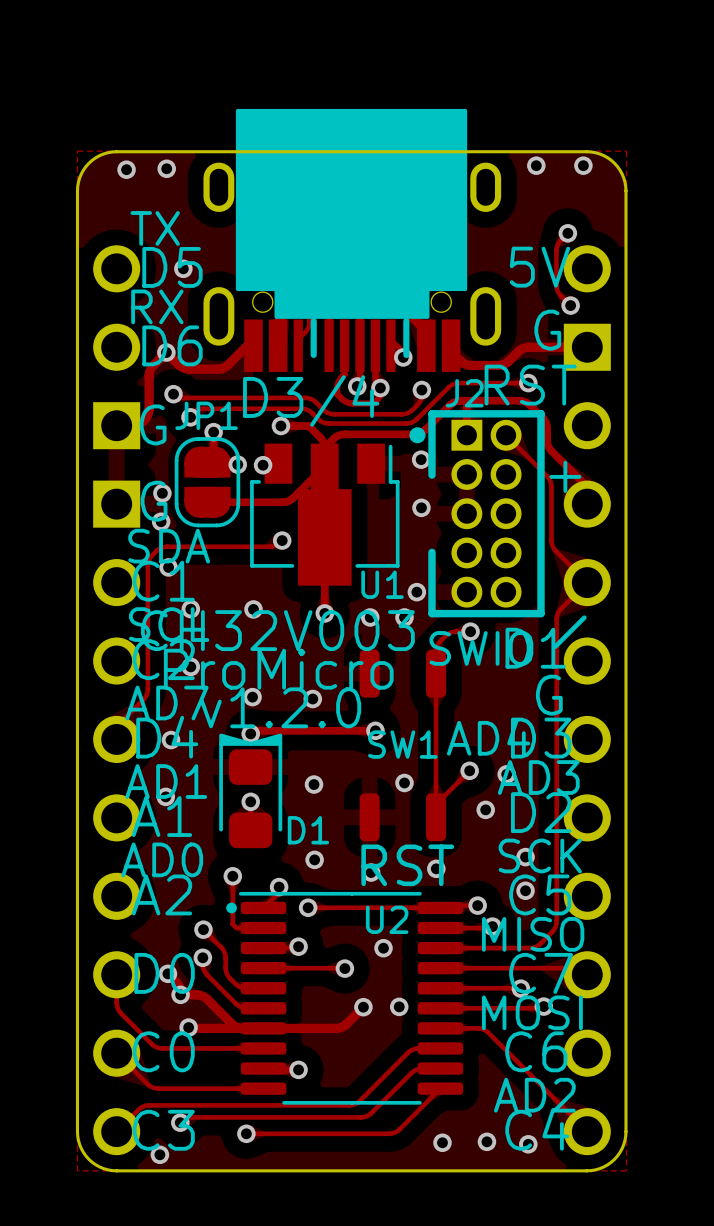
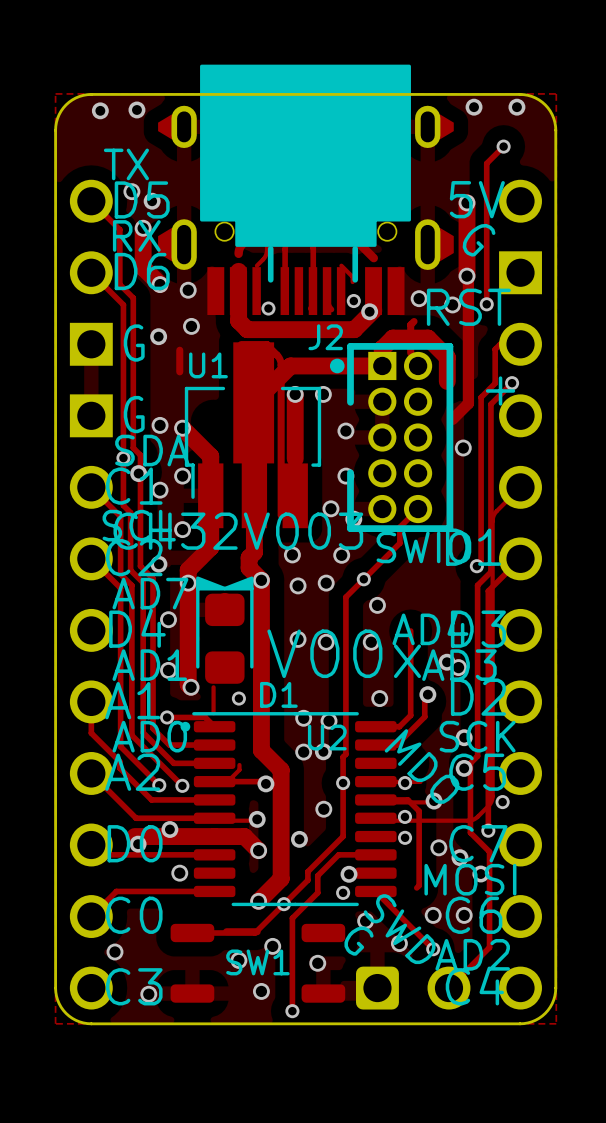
part footprint: [203, 108, 502, 372] -> [158, 64, 454, 316]
track: none -> (503, 146) (486, 163) (486, 304)
via: none -> (503, 146)
track: (567, 233) (559, 241) (556, 248) (556, 284) (559, 294) (570, 305) -> none
via: (567, 233) -> none
via: none -> (131, 191)
track: none -> (91, 201) (119, 229) (119, 284) (133, 298) (133, 448) (140, 455) (140, 566) (153, 578) (153, 728) (169, 745) (214, 745)
track: none -> (467, 202) (468, 403) (452, 419)
via: none -> (467, 202)
track: none -> (143, 228) (143, 267) (160, 284)
via: none -> (143, 228)
via: (570, 305) -> none
text position: RX (157, 306) -> RX (136, 235)
text rotation: 0° (547, 330) -> 45° clockwise (479, 240)
track: (253, 339) (227, 365) (220, 368) (185, 368) (166, 352) (149, 371) (147, 414) (140, 423) (132, 425) -> none
track: none -> (238, 271) (238, 320) (247, 329) (354, 329) (373, 310)
track: (344, 345) (344, 374) (338, 382) (337, 394) (349, 403) (374, 403) (379, 396) (380, 388) -> none
track: none -> (91, 272) (123, 304) (123, 505) (130, 512) (130, 570) (143, 582) (143, 732) (173, 763) (214, 763)
track: (587, 347) (525, 347) (506, 362) (498, 365) (467, 364) (451, 351) -> none
via: none -> (467, 276)
via: (166, 352) -> none
via: (403, 357) -> none
via: none -> (160, 284)
via: none -> (188, 290)
via: none -> (419, 298)
via: none -> (353, 301)
via: none -> (486, 304)
track: (528, 383) (454, 383) (448, 387) (415, 420) (408, 423) (327, 423) (320, 420) (309, 410) (301, 408) (201, 408) (193, 411) (190, 417) -> none
via position: (528, 383) -> (452, 304)
via: none -> (268, 308)
via: (357, 386) -> none
via: (380, 388) -> none
track: (421, 390) (418, 403) (410, 411) (401, 414) (332, 414) (324, 411) (313, 400) (306, 397) (177, 397) (173, 394) -> none
J2 name position: J2 (464, 393) -> J2 (325, 337)
via: (173, 394) -> none
text: D3/4 (311, 400) -> none
via: none -> (191, 326)
text position: G (153, 424) -> G (134, 343)
track: none -> (520, 344) (500, 344) (495, 349) (495, 383) (481, 397) (481, 561) (476, 566)
via: (280, 426) -> none
via: (213, 432) -> none
track: (506, 435) (549, 479) (551, 487) (552, 546) (587, 582) -> none
U1 footprint: [250, 443, 400, 586] -> [184, 342, 322, 529]
track: (324, 447) (335, 437) (342, 434) (418, 433) (425, 429) (451, 404) (457, 400) (521, 400) (528, 403) (543, 418) (546, 425) (549, 448) (587, 486) -> none
via: (421, 459) -> none
via: (237, 464) -> none
via: (263, 465) -> none
track: (324, 466) (293, 497) (287, 501) (207, 502) -> none
track: none -> (447, 381) (447, 357) (428, 338) (392, 338) (382, 348) (382, 365) (290, 365) (253, 402) (253, 383)
track: none -> (512, 383) (490, 404) (490, 572) (477, 585) (477, 756) (470, 763) (470, 832) (489, 851) (489, 947) (448, 988)
via: none -> (512, 383)
track: none -> (295, 394) (295, 458)
via: none -> (295, 394)
via: none -> (323, 394)
JP1: (207, 482) -> none
via: (162, 493) -> none
text position: G (154, 501) -> G (134, 414)
via: (421, 507) -> none
J2 position: (477, 513) -> (391, 437)
via: none -> (160, 425)
track: none -> (182, 428) (210, 456) (210, 547) (188, 570) (188, 684) (191, 687)
via: none -> (182, 428)
via: none -> (345, 431)
via: (161, 521) -> none
via: none -> (463, 448)
track: (282, 540) (275, 545) (269, 546) (165, 546) (158, 549) (152, 555) (147, 566) (147, 691) (144, 698) (116, 726) -> none
via: (282, 540) -> none
text position: SDA (169, 546) -> SDA (152, 450)
via: none -> (123, 458)
via: none -> (182, 476)
via: none -> (345, 476)
track: none -> (91, 487) (120, 516) (120, 574) (131, 585) (131, 735) (182, 785)
U1 name position: U1 (382, 584) -> U1 (208, 365)
via: none -> (160, 490)
track: none -> (254, 495) (254, 552) (249, 557) (249, 567) (261, 580) (261, 750) (281, 770) (281, 878) (258, 901)
via: (416, 592) -> none
track: none -> (418, 509) (399, 527) (399, 543) (345, 597) (345, 754) (343, 757) (343, 836) (307, 871) (307, 880) (255, 933) (192, 933)
via: (190, 609) -> none
via: (253, 609) -> none
via: (324, 613) -> none
via position: (370, 617) -> (330, 508)
line: (584, 617) (555, 646) -> none
via: none -> (182, 529)
track: (470, 631) (448, 633) (439, 642) (436, 649) (436, 817) -> none
via: (470, 631) -> none
SW1 footprint: [359, 649, 447, 842] -> [170, 923, 346, 1003]
via: none -> (292, 554)
via: none -> (341, 555)
track: none -> (91, 558) (120, 588) (120, 746) (159, 785)
track: none -> (520, 558) (488, 591) (488, 830)
text: ProMicro (278, 669) -> none
via: none -> (476, 566)
via: none -> (363, 579)
via: none -> (188, 583)
via: none -> (326, 583)
via: none -> (298, 585)
text rotation: 0° (549, 695) -> 45° clockwise (359, 941)
text position: G (549, 695) -> G (359, 941)
via: (252, 697) -> none
via position: (312, 699) -> (261, 580)
text position: AD7 (166, 703) -> AD7 (150, 593)
text: v1.2.0 (280, 707) -> none
via: none -> (377, 605)
via: none -> (168, 619)
track: (375, 730) (253, 730) (250, 733) -> none
via: (375, 730) -> none
D1 footprint: [219, 733, 283, 849] -> [196, 576, 254, 684]
via: (250, 733) -> none
via: (171, 740) -> none
track: none -> (410, 630) (410, 715) (399, 726) (375, 726)
via: none -> (298, 639)
via: none -> (326, 642)
via: none -> (371, 642)
text: none -> V00x (344, 653)
track: (469, 770) (436, 804) -> none
via: (469, 770) -> none
text position: AD3 (538, 777) -> AD3 (459, 665)
via: none -> (458, 667)
text position: AD1 (166, 781) -> AD1 (149, 665)
via: (404, 782) -> none
via: none -> (168, 670)
via: (314, 784) -> none
via: (165, 796) -> none
via: none -> (191, 687)
via: (250, 801) -> none
via: none -> (238, 698)
via: none -> (379, 698)
track: none -> (91, 701) (91, 733) (119, 761) (119, 768) (151, 799) (214, 799)
track: none -> (424, 701) (424, 716) (396, 745) (375, 745)
track: none -> (167, 717) (205, 717) (214, 726)
via: none -> (167, 717)
via: none -> (303, 718)
via: none -> (329, 721)
text position: AD0 (162, 859) -> AD0 (149, 736)
via: (314, 859) -> none
via: (436, 868) -> none
via: none -> (303, 752)
track: (232, 876) (232, 923) (236, 928) (263, 928) -> none
via: (232, 876) -> none
via: (279, 887) -> none
track: none -> (91, 773) (136, 818) (214, 818)
track: none -> (261, 780) (214, 781)
via position: (477, 905) -> (405, 783)
via: none -> (343, 783)
track: (308, 907) (440, 907) -> none
via: none -> (159, 785)
via: none -> (182, 785)
track: none -> (375, 799) (407, 799) (419, 811) (419, 885) (416, 887)
via: none -> (502, 802)
track: (203, 929) (223, 950) (228, 976) (238, 986) (246, 988) -> none
via: (203, 929) -> none
text: MISO (533, 934) -> MDO (422, 766)
via: none -> (404, 816)
via position: (383, 948) -> (323, 809)
track: (202, 957) (203, 967) (206, 974) (237, 1005) (246, 1008) -> none
via: none -> (488, 830)
track: none -> (134, 836) (244, 836) (258, 850)
via: none -> (405, 837)
track: (263, 968) (344, 968) -> none
track: (440, 968) (580, 968) -> none
track: (167, 973) (178, 984) (180, 994) (203, 996) (233, 1025) (242, 1028) -> none
track: (116, 974) (116, 1002) (118, 1010) (155, 1046) (162, 1048) (263, 1048) -> (91, 845) (101, 854) (214, 854)
via: none -> (438, 847)
via: none -> (258, 850)
track: none -> (375, 854) (338, 854) (317, 875) (317, 892) (292, 918) (292, 1011)
track: (440, 988) (520, 988) -> none
via: (180, 994) -> none
U2 position: (344, 998) -> (288, 809)
via: none -> (179, 873)
track: (543, 1006) (542, 1008) (440, 1008) -> none
track: (363, 1007) (345, 1024) (337, 1028) (188, 1027) -> none
via: (363, 1007) -> none
track: none -> (375, 891) (433, 949)
via: (188, 1027) -> none
via: none -> (343, 892)
track: (440, 1028) (479, 1028) (486, 1031) (587, 1131) -> none
via: none -> (258, 901)
via: none -> (283, 904)
track: (440, 1048) (417, 1048) (410, 1051) (359, 1100) (352, 1104) (147, 1105) (139, 1108) (116, 1131) -> none
via: none -> (433, 915)
via: none -> (464, 915)
track: (116, 1053) (148, 1085) (155, 1088) (263, 1088) -> (91, 916) (116, 891) (214, 891)
via: none -> (365, 921)
text: none -> SWD (399, 929)
track: (422, 1068) (413, 1071) (371, 1112) (363, 1117) (191, 1117) (180, 1122) -> none
via position: (298, 1069) -> (272, 946)
via: none -> (399, 943)
track: (440, 1088) (399, 1129) (391, 1133) (246, 1133) -> none
via: none -> (433, 949)
via: none -> (114, 952)
via: none -> (238, 960)
via: none -> (317, 963)
via position: (180, 1122) -> (148, 994)
part: none -> (413, 988)
via: (246, 1133) -> none
via: none -> (261, 991)
via: (486, 1141) -> none
via: (442, 1142) -> none
via: (528, 1144) -> none
via: (159, 1154) -> none
via: none -> (292, 1011)

